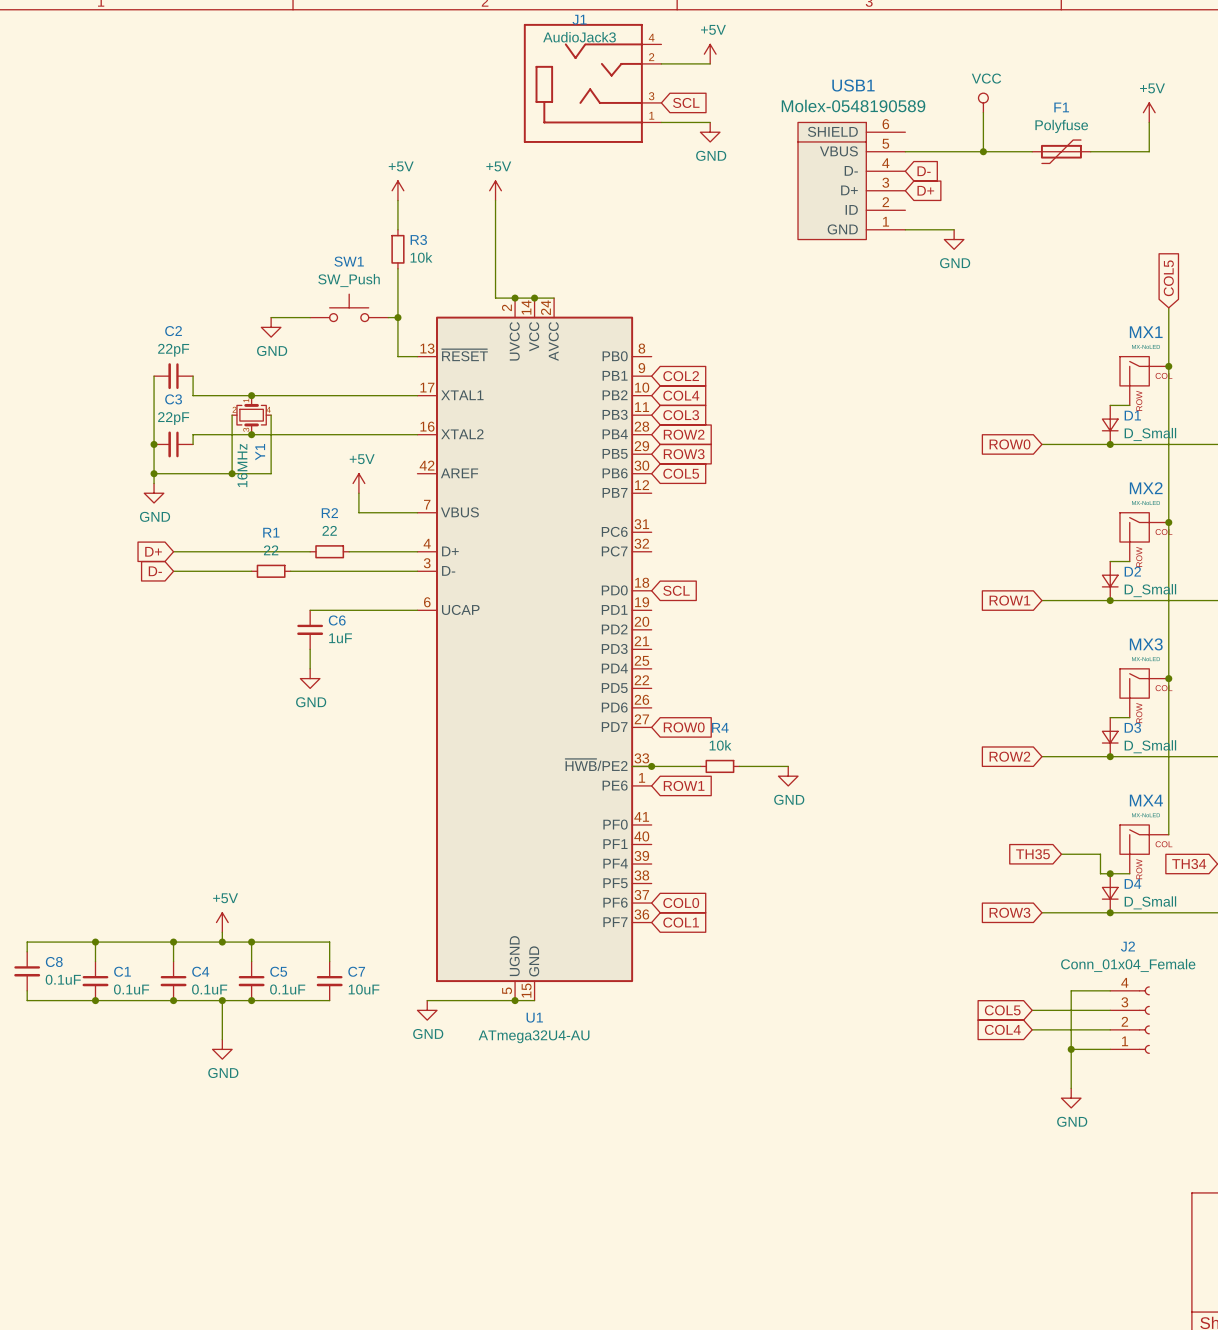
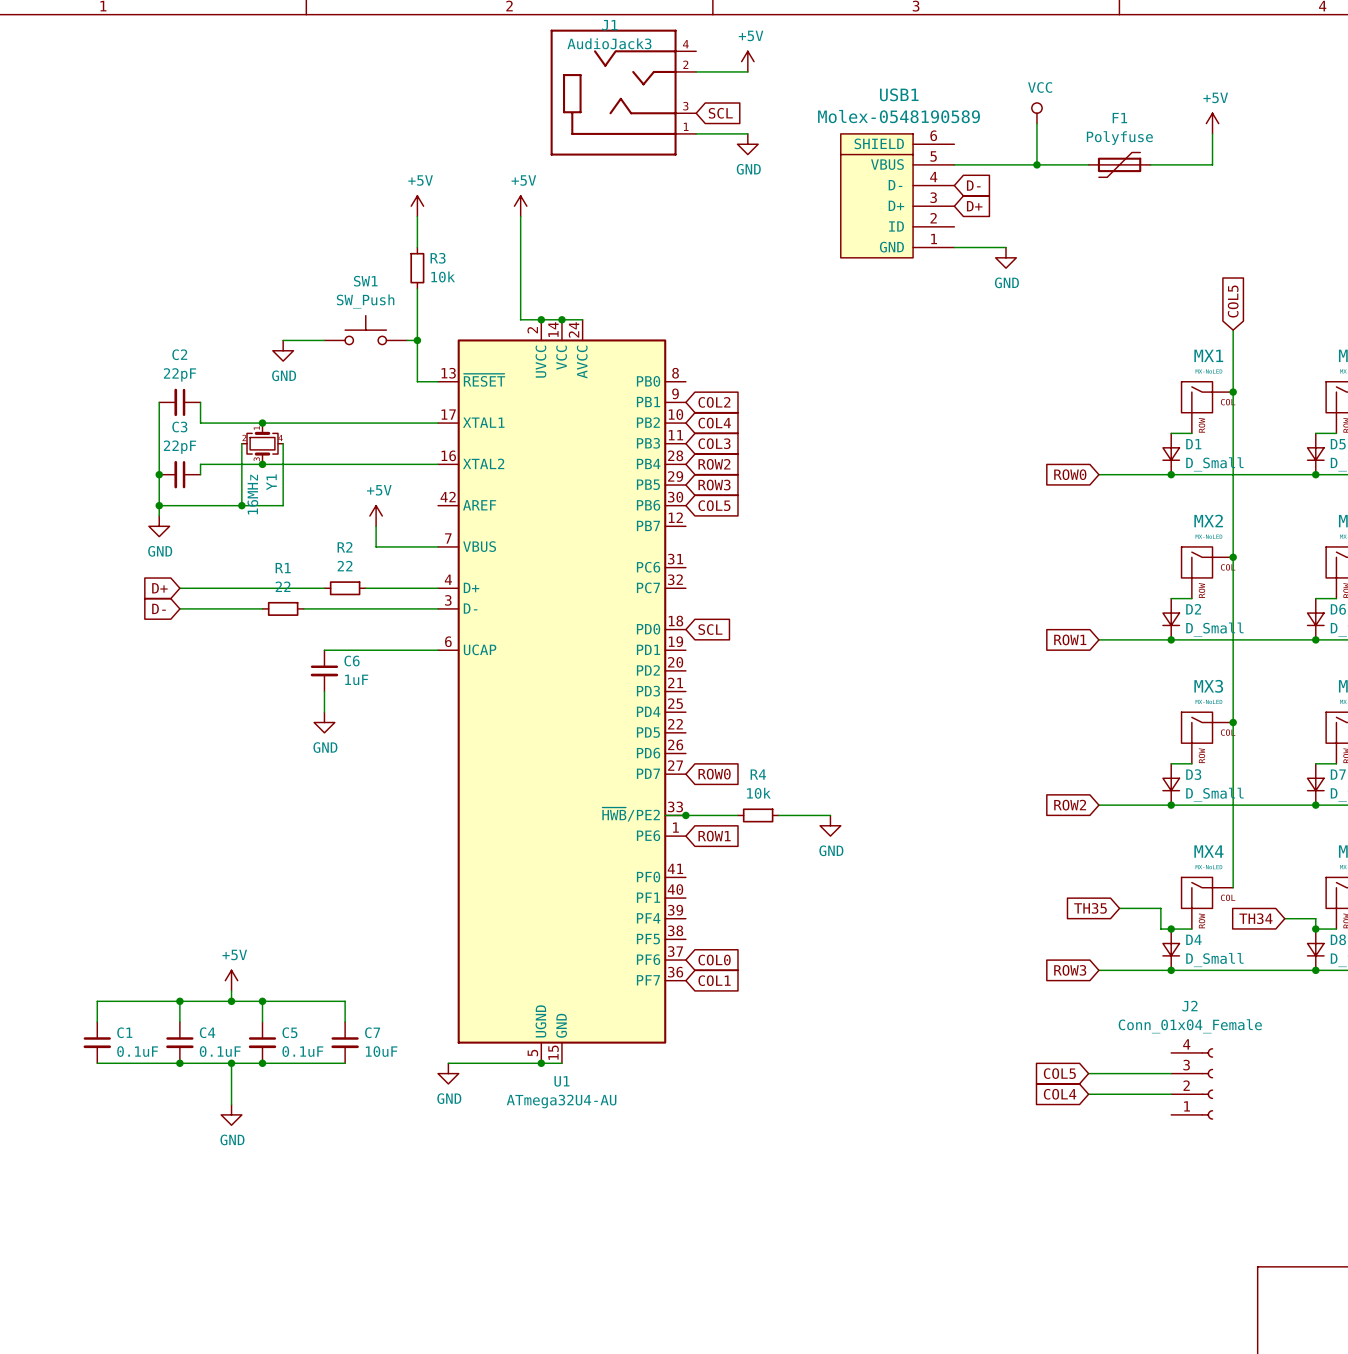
wire: (95, 942) (27, 942) (27, 951) -> none
junction: (95, 942) -> none
C8: 0.1uF (27, 971) -> none
wire: (27, 990) (27, 1000) (95, 1000) -> none
wire: (1110, 990) (1071, 990) (1071, 1088) -> none
junction: (95, 1000) -> none
wire: (1071, 1049) (1110, 1049) -> none
junction: (1071, 1049) -> none
power symbol: GND (1071, 1098) -> none

